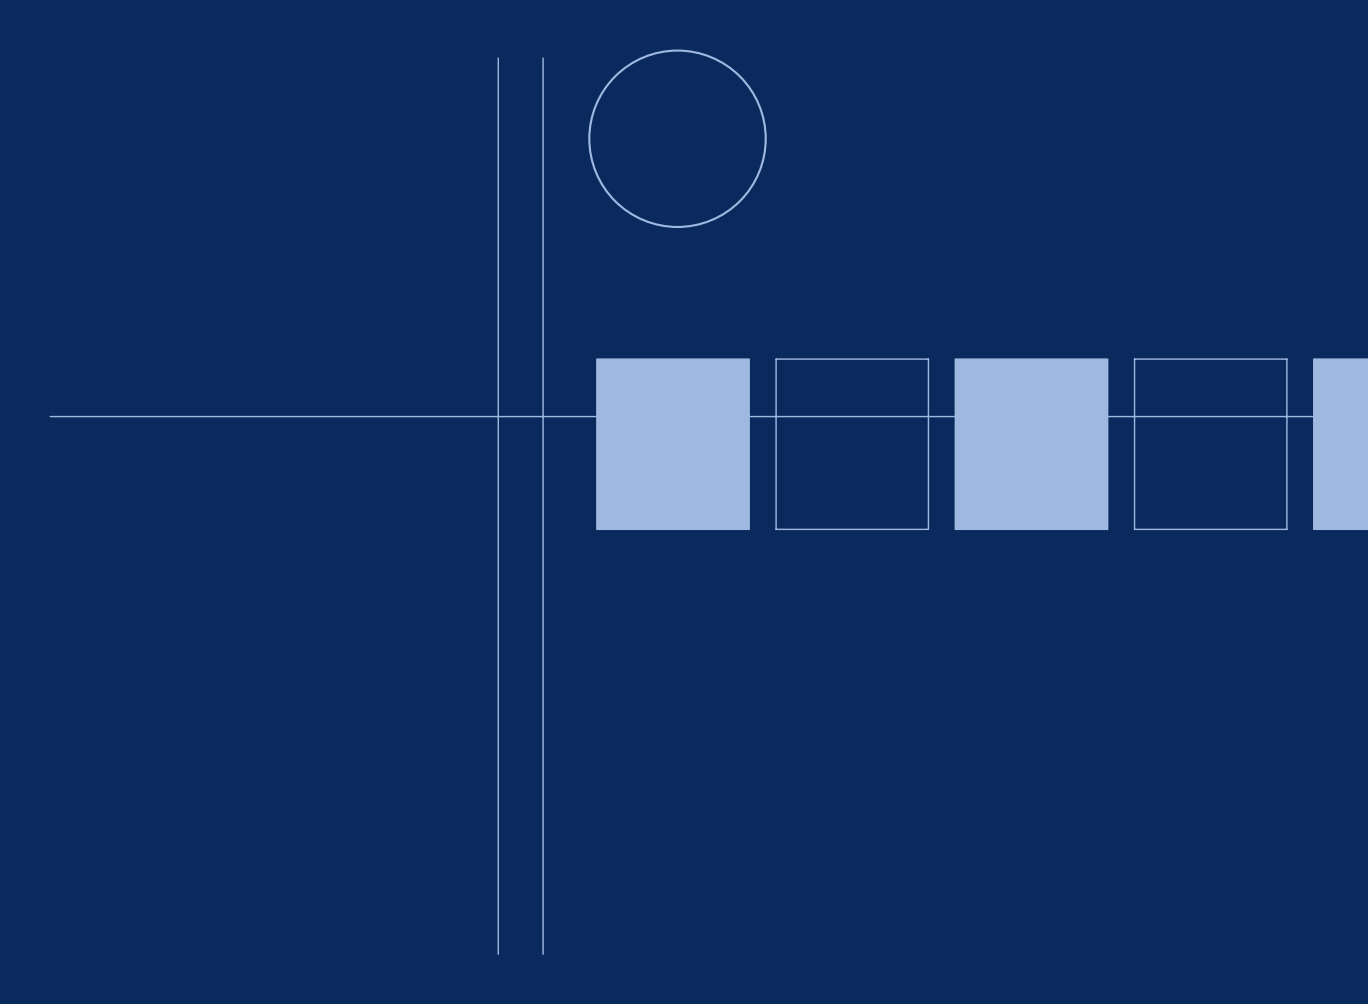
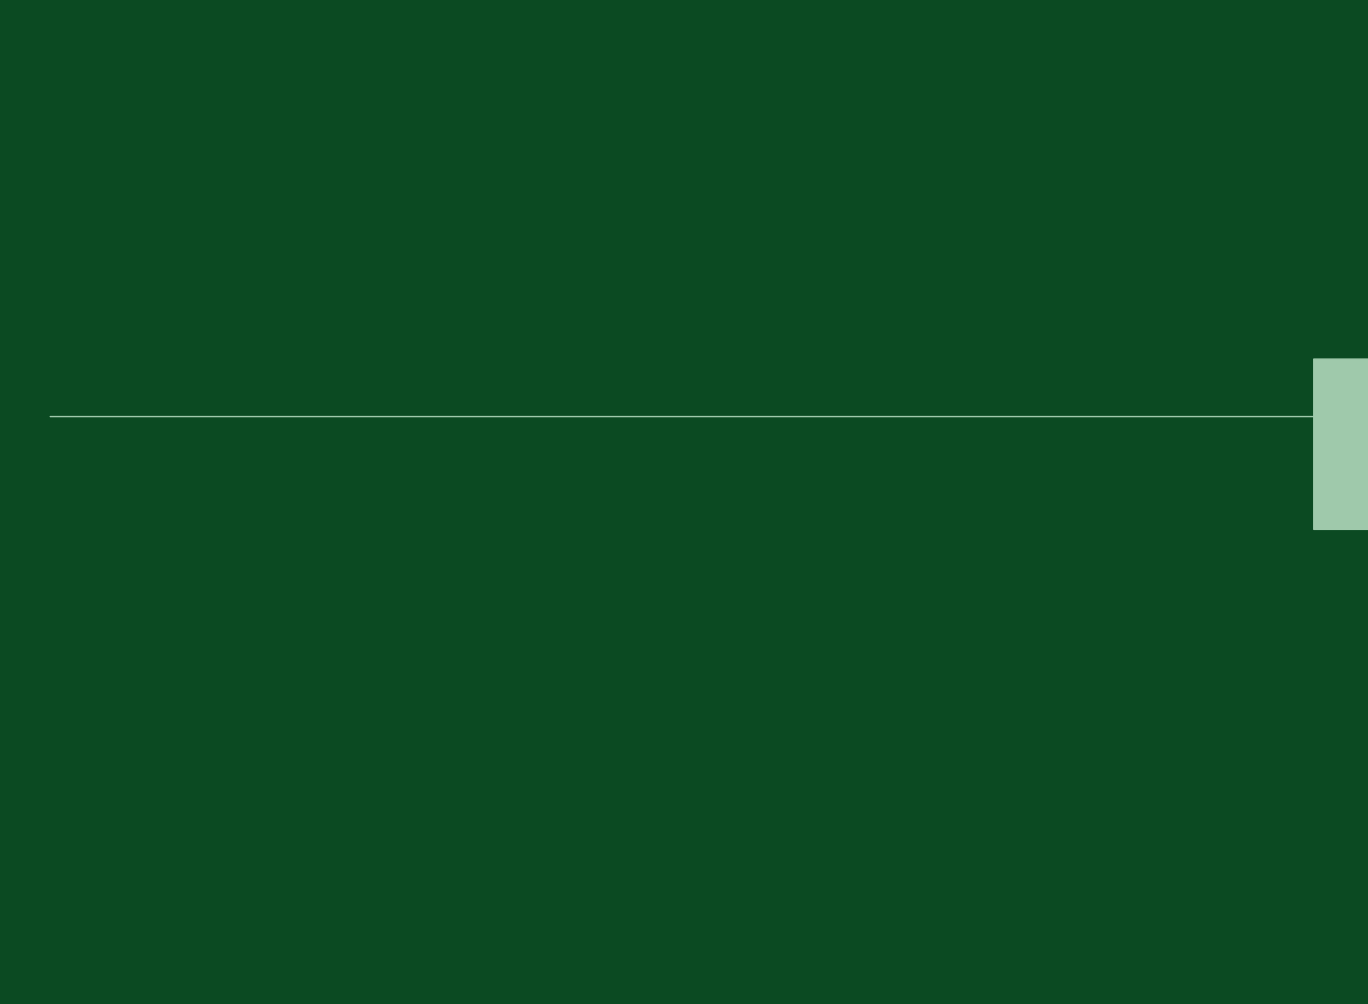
drawing: [588, 49, 767, 229] -> none
line: (498, 58) (498, 954) -> none
line: (543, 58) (543, 954) -> none
drawing: [596, 358, 750, 531] -> none
drawing: [954, 358, 1109, 531] -> none
line: (776, 359) (928, 359) (928, 529) (776, 529) (776, 359) -> none
line: (1134, 359) (1286, 359) (1286, 529) (1134, 529) (1134, 359) -> none

